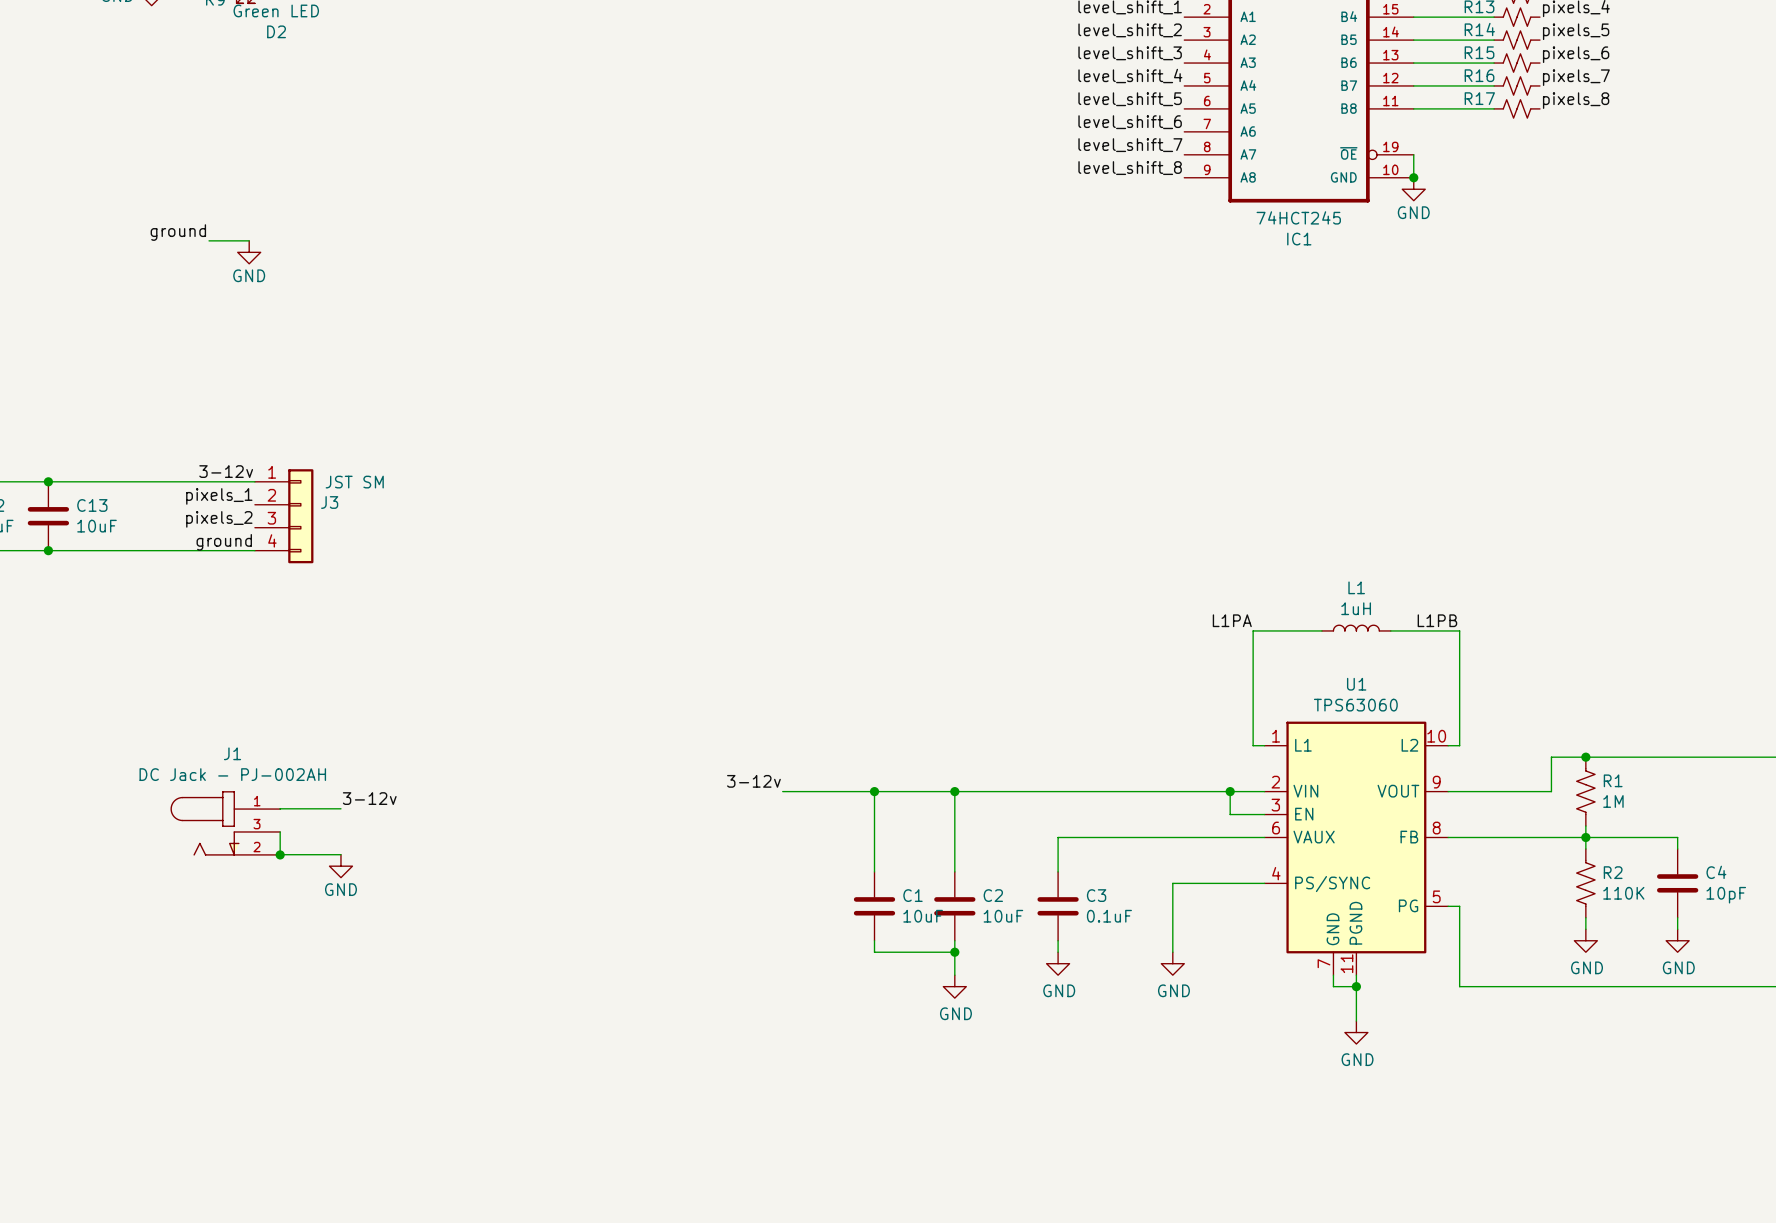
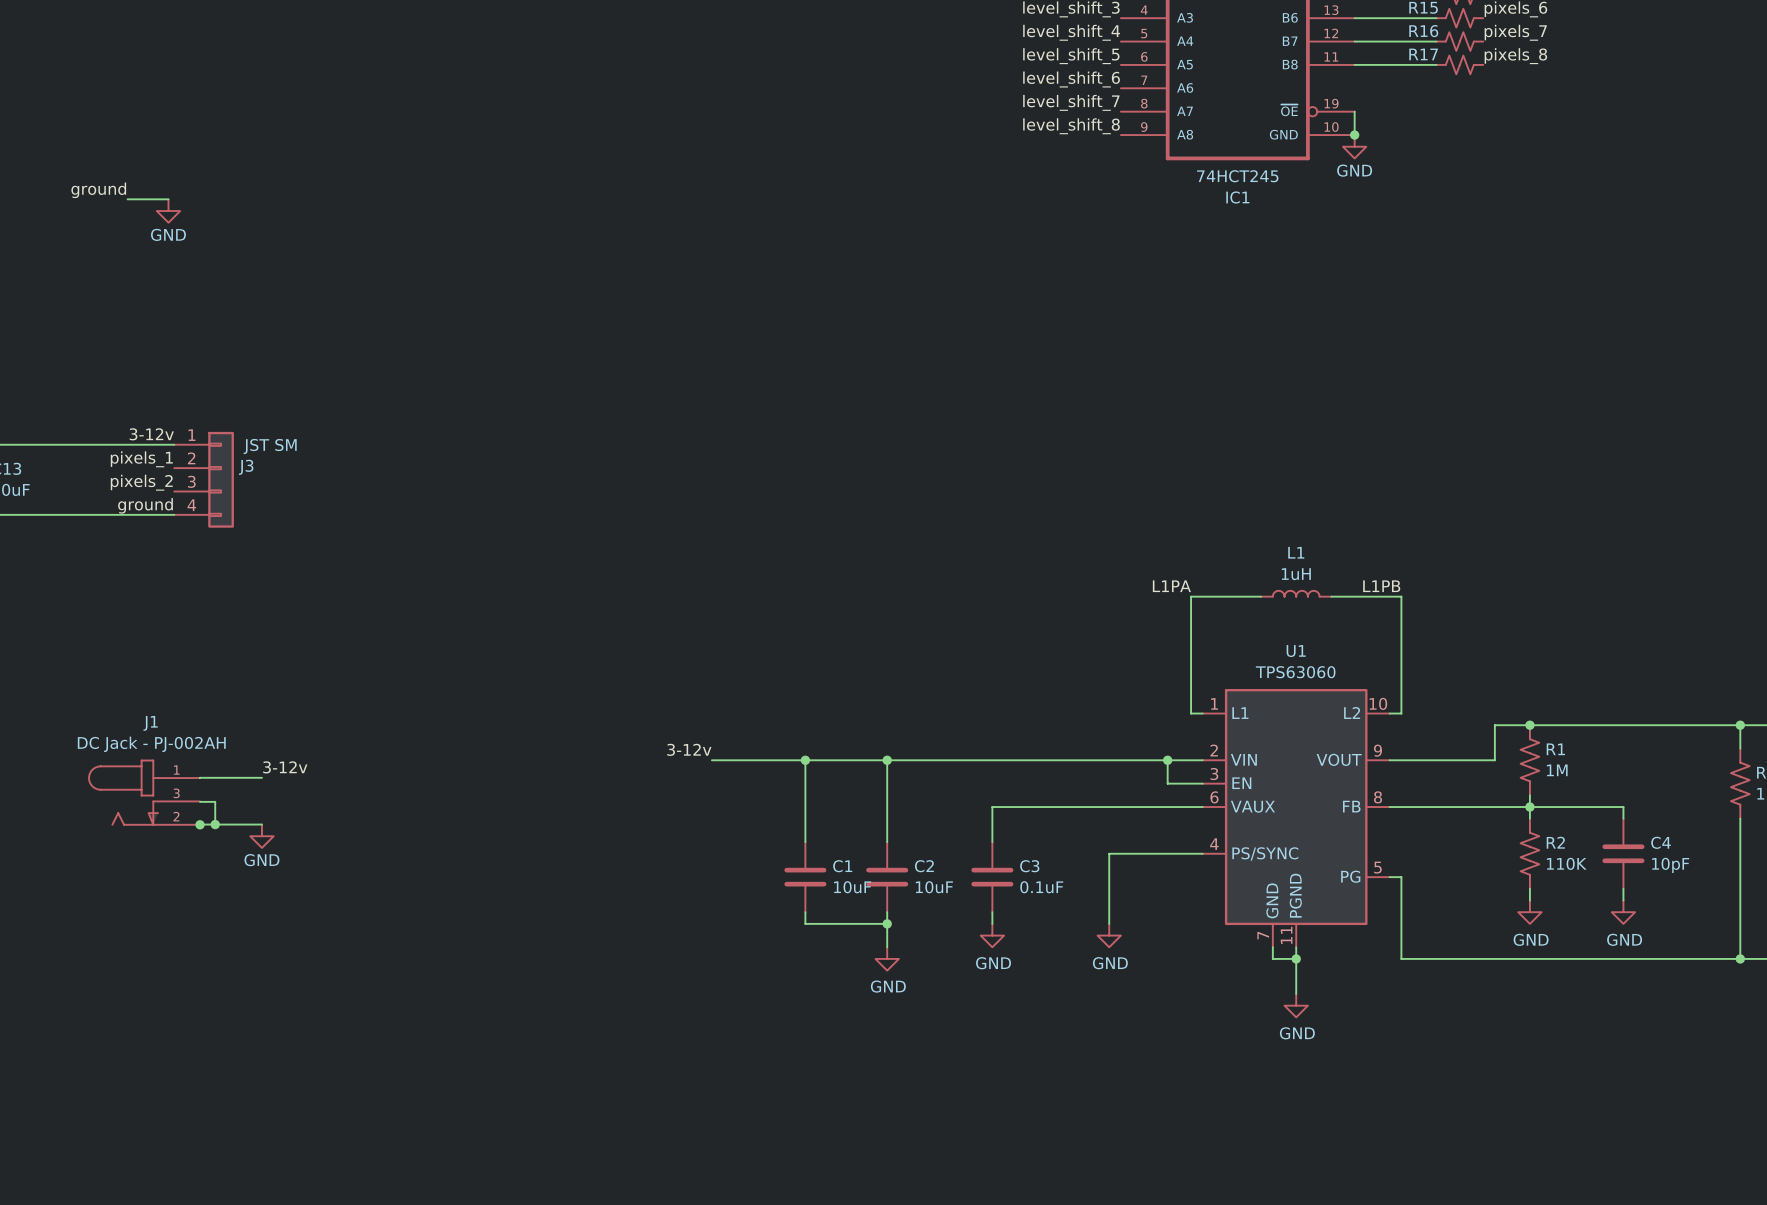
wire: (280, 831) (280, 854) -> none
wire: none -> (200, 801) (215, 801) (215, 824)
junction: none -> (215, 824)

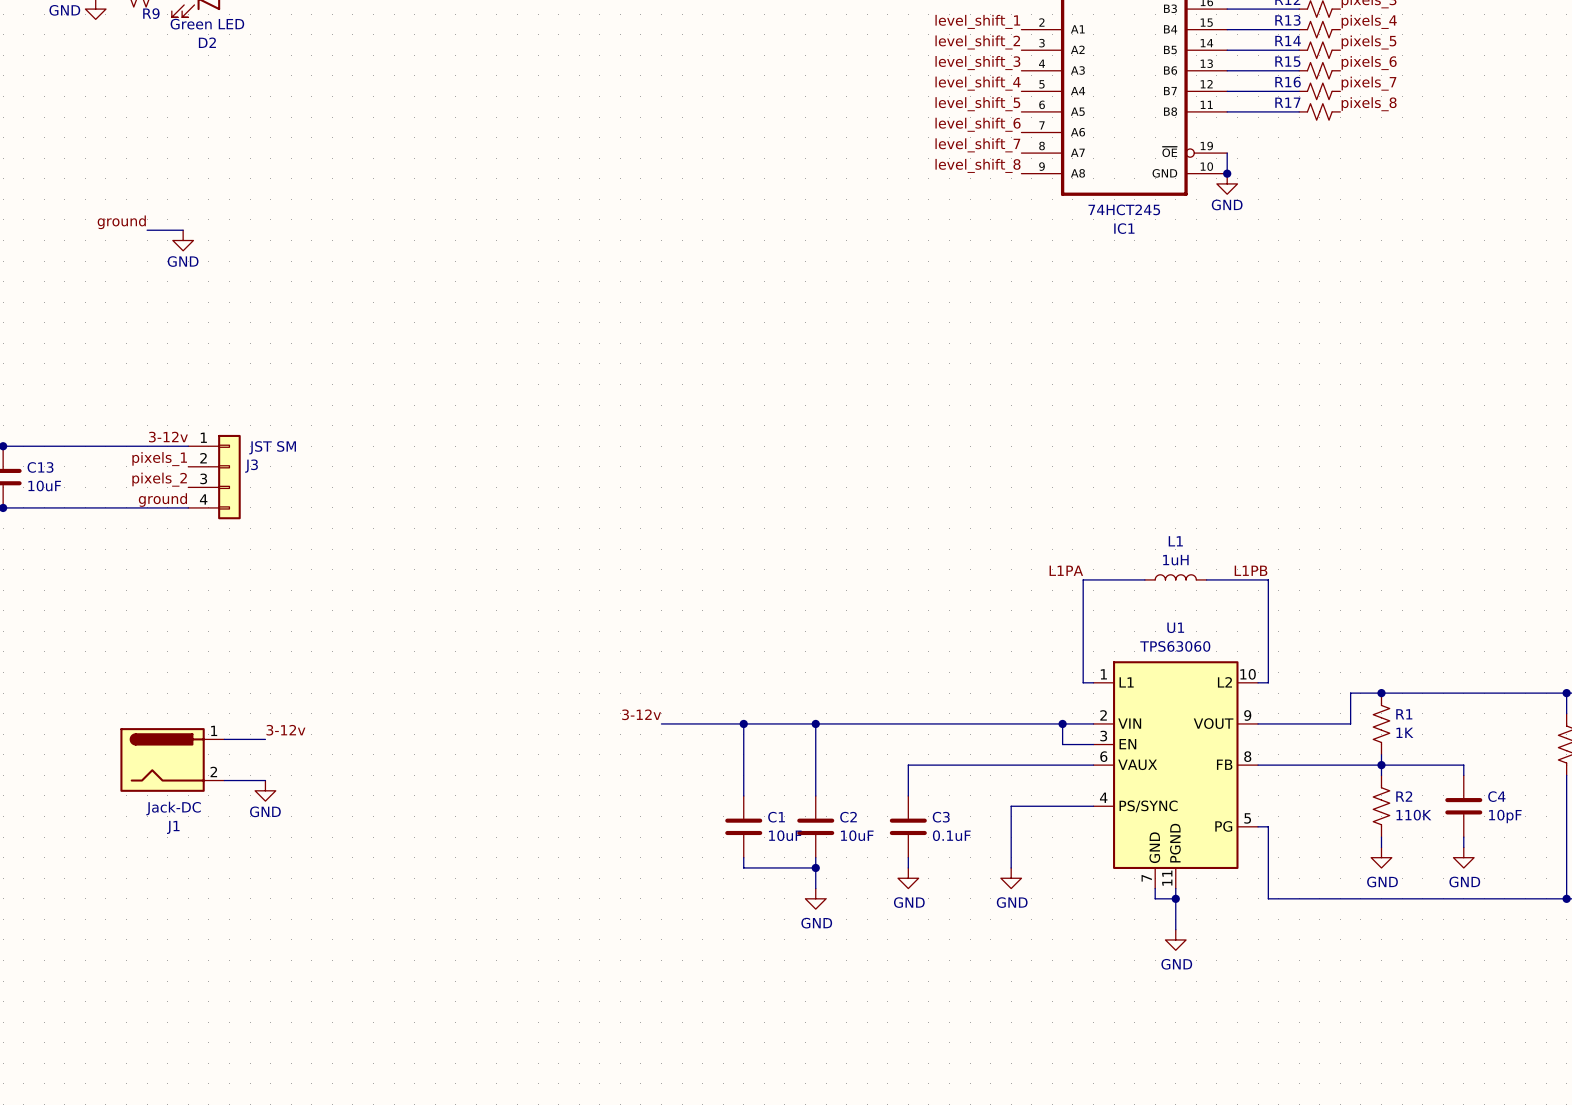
J1 name position: J1 (150, 723) -> J1 (173, 827)
J1 value: DC Jack - PJ-002AH (151, 744) -> Jack-DC (173, 808)
J1 symbol: [88, 759, 201, 826] -> [120, 728, 225, 792]
R1 value: 1M (1557, 770) -> 1K (1404, 732)
wire: (200, 801) (215, 801) (215, 824) (200, 825) -> none
junction: (200, 824) -> none
junction: (215, 824) -> none

